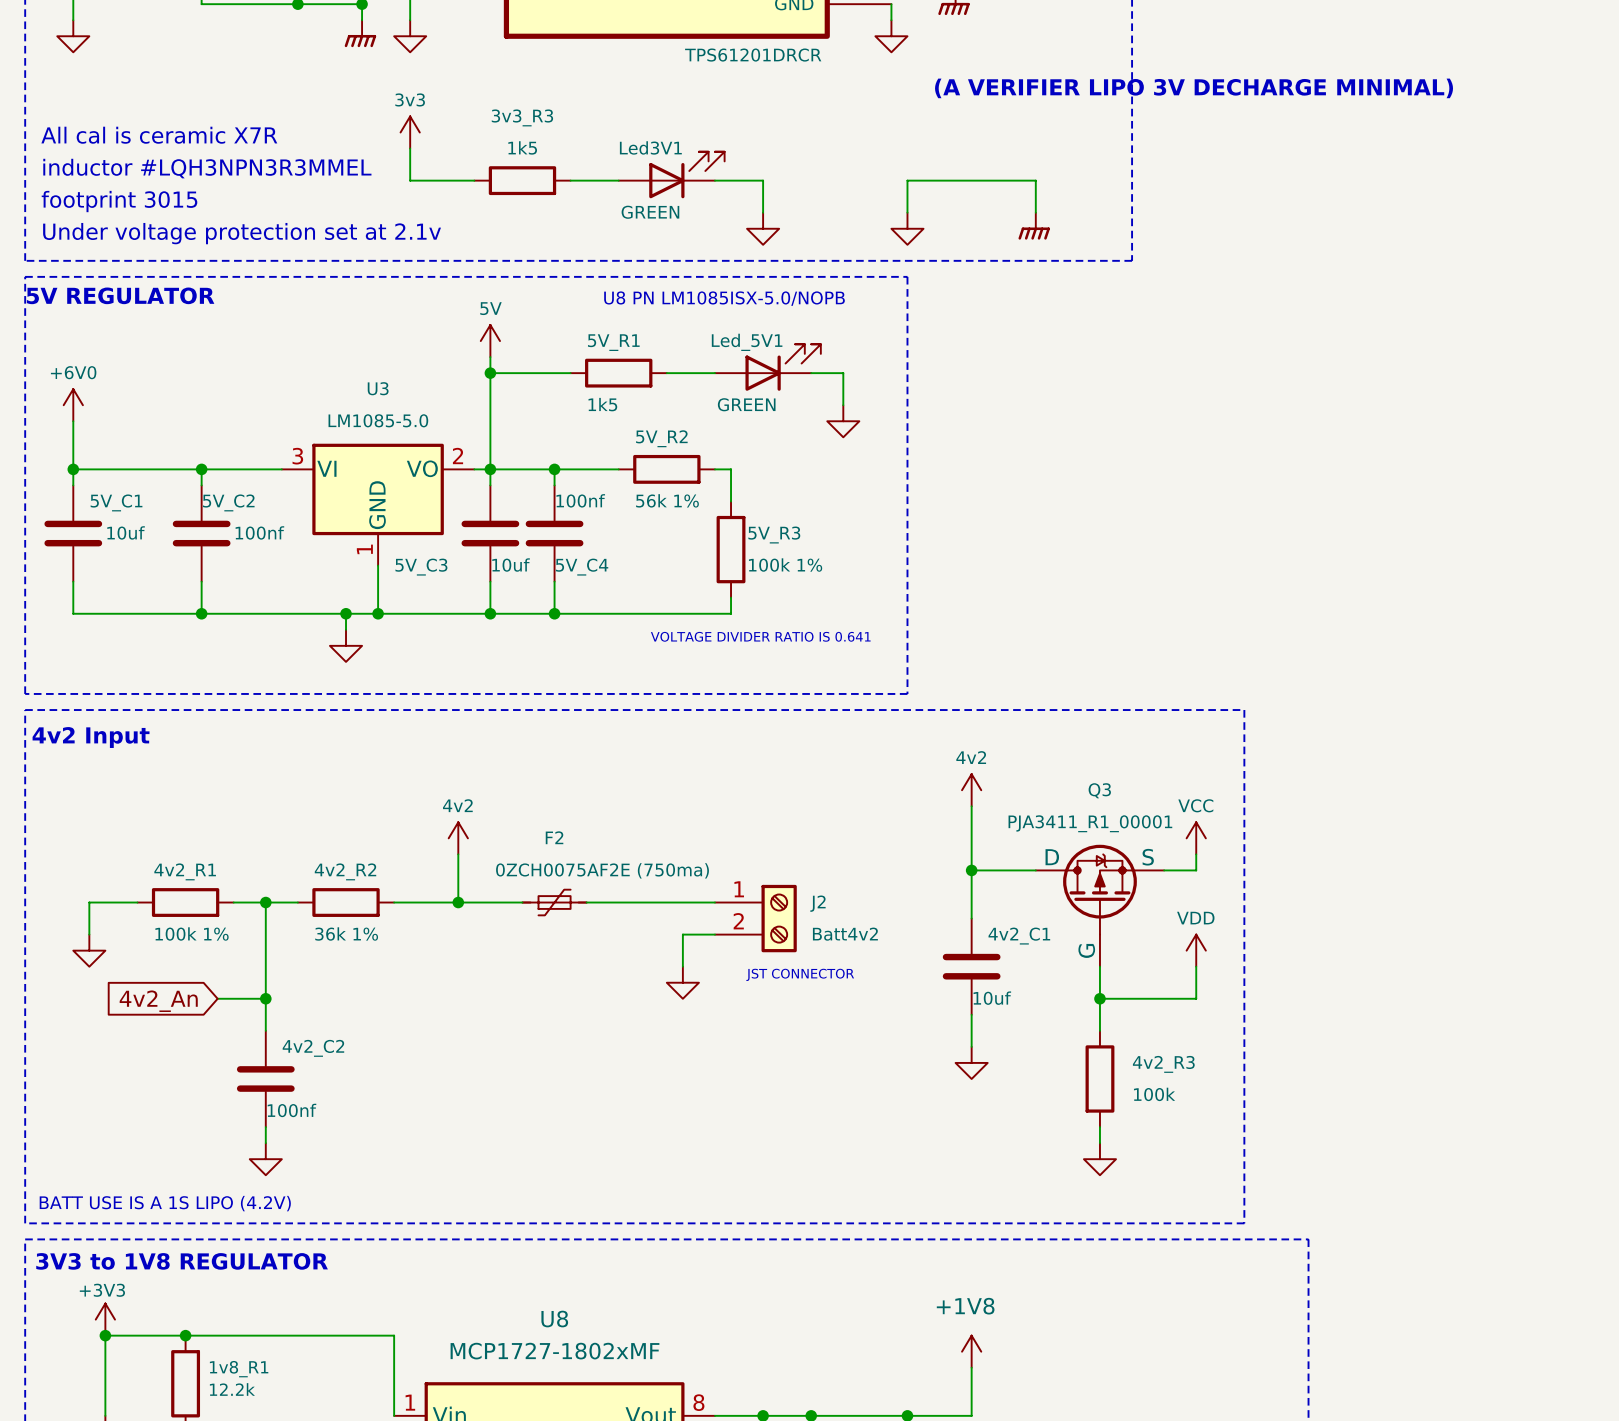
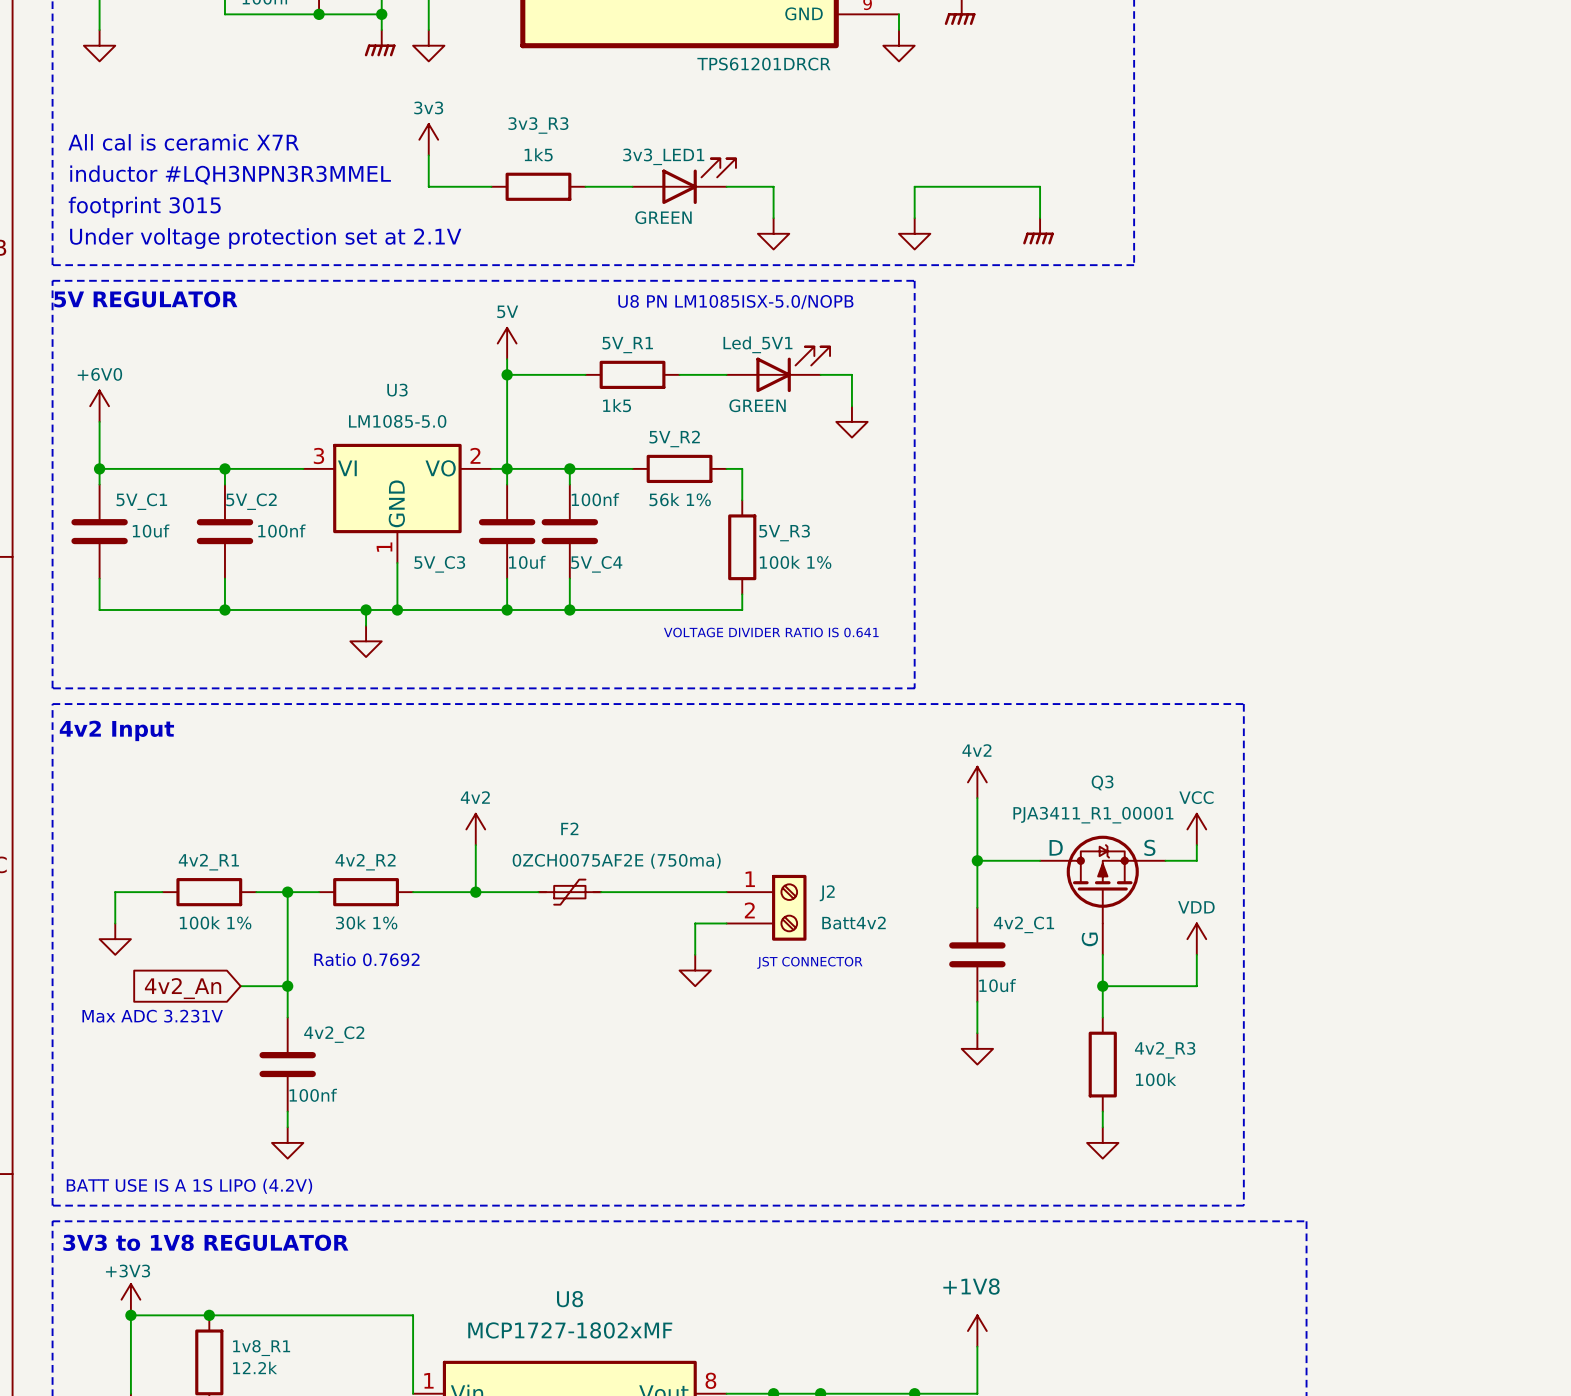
text: (A VERIFIER LIPO 3V DECHARGE MINIMAL) (1194, 88) -> none
Led3V1 name: Led3V1 (650, 147) -> 3v3_LED1 (663, 156)
text: Under voltage protection set at 2.1v (242, 233) -> Under voltage protection set at 2.1V (265, 238)
4v2_R2 value: 36k 1% (346, 933) -> 30k 1% (366, 922)
text: none -> Ratio 0.7692 (366, 959)
text: none -> Max ADC 3.231V (152, 1016)

